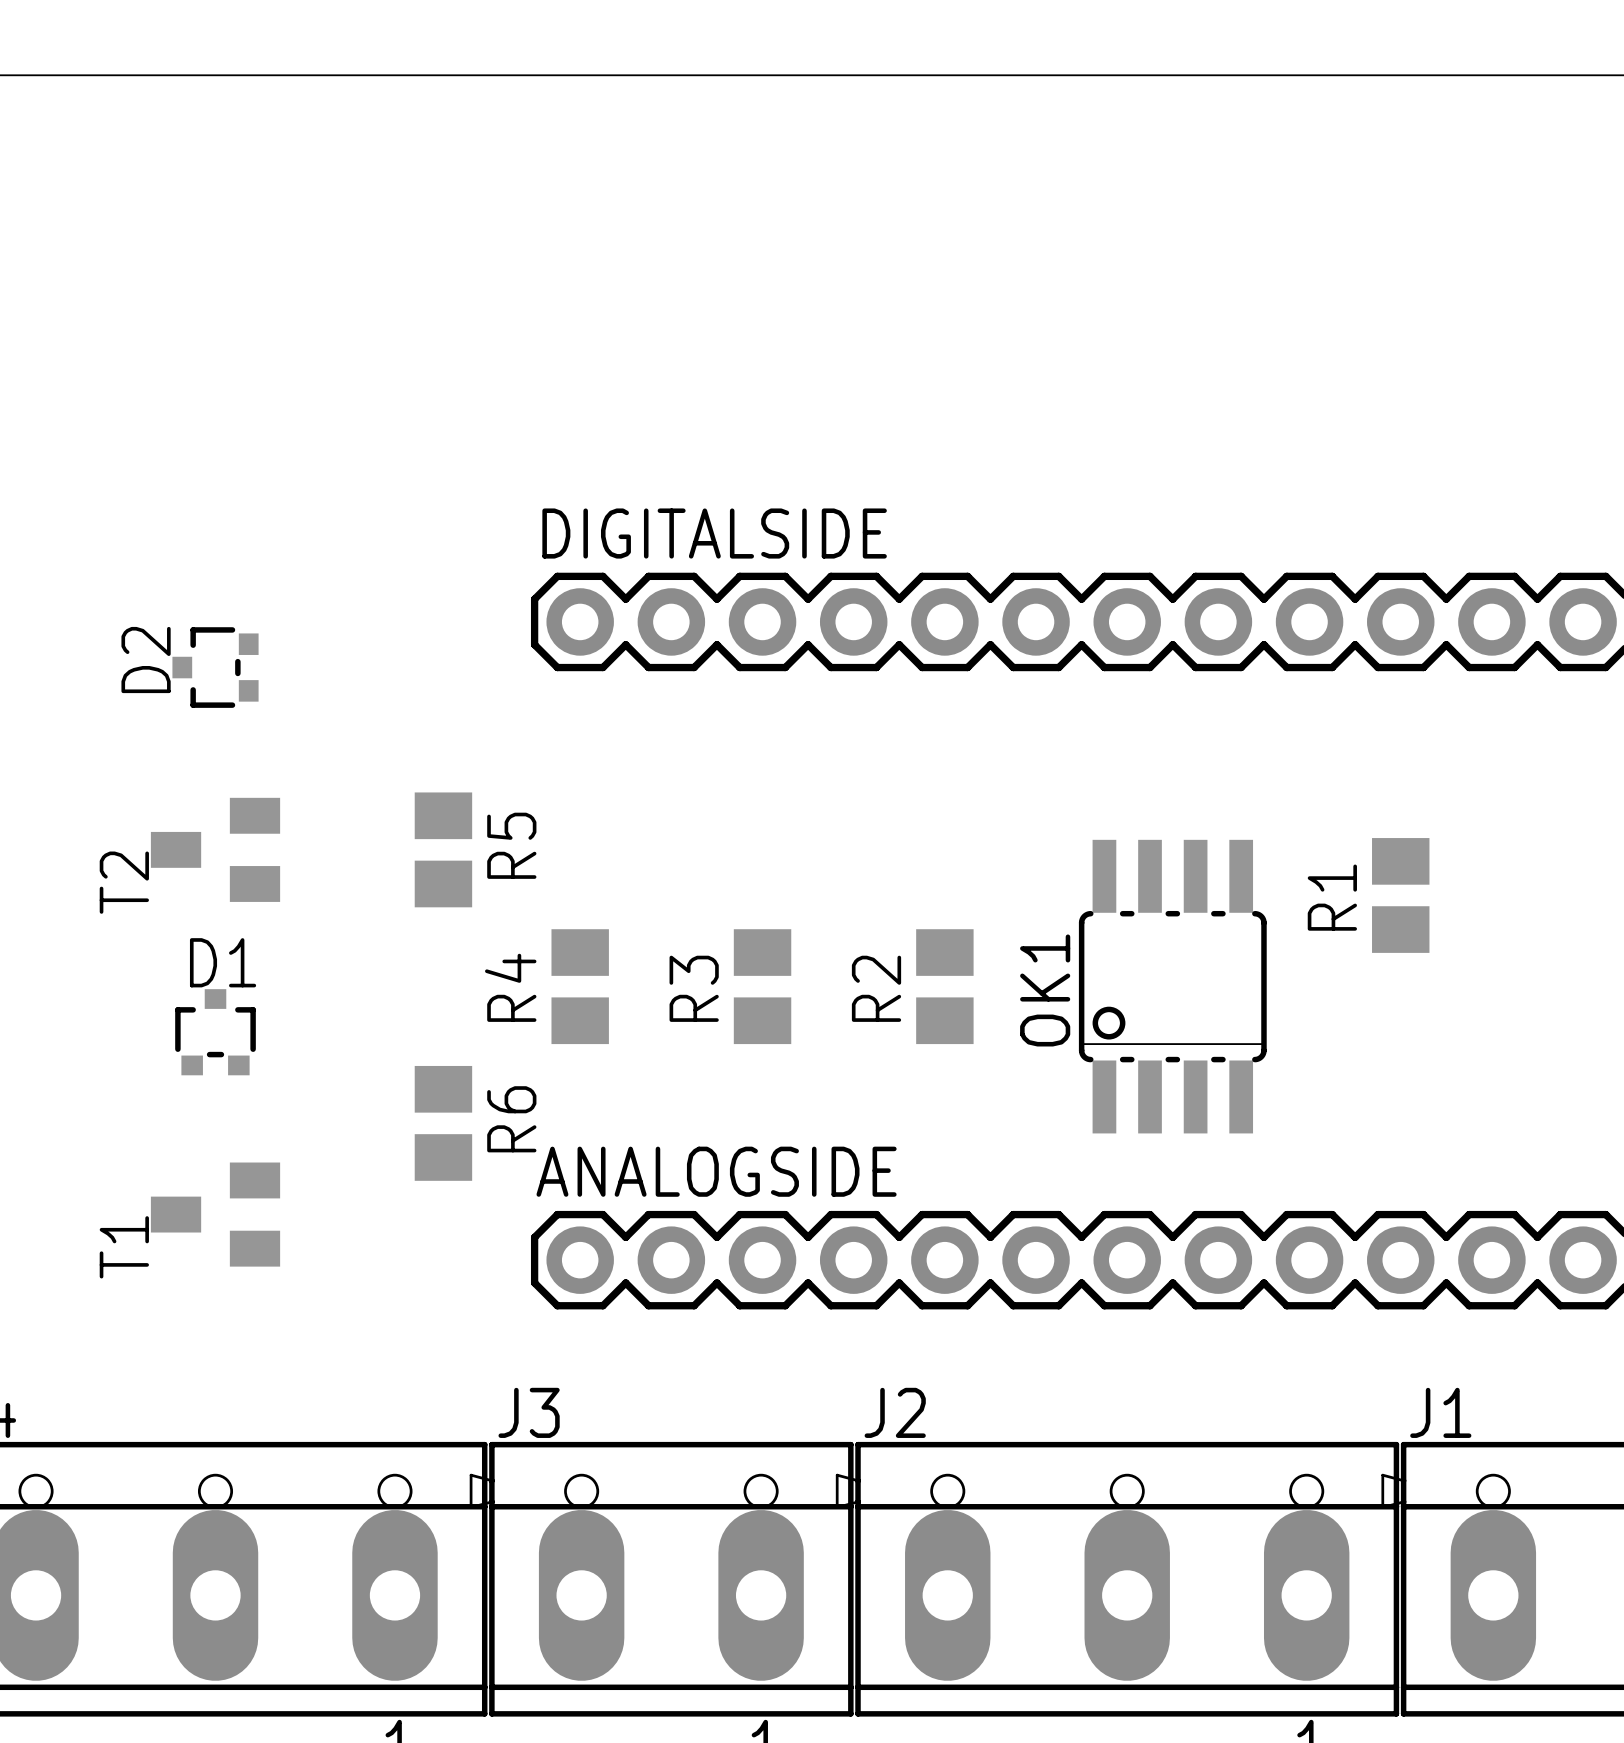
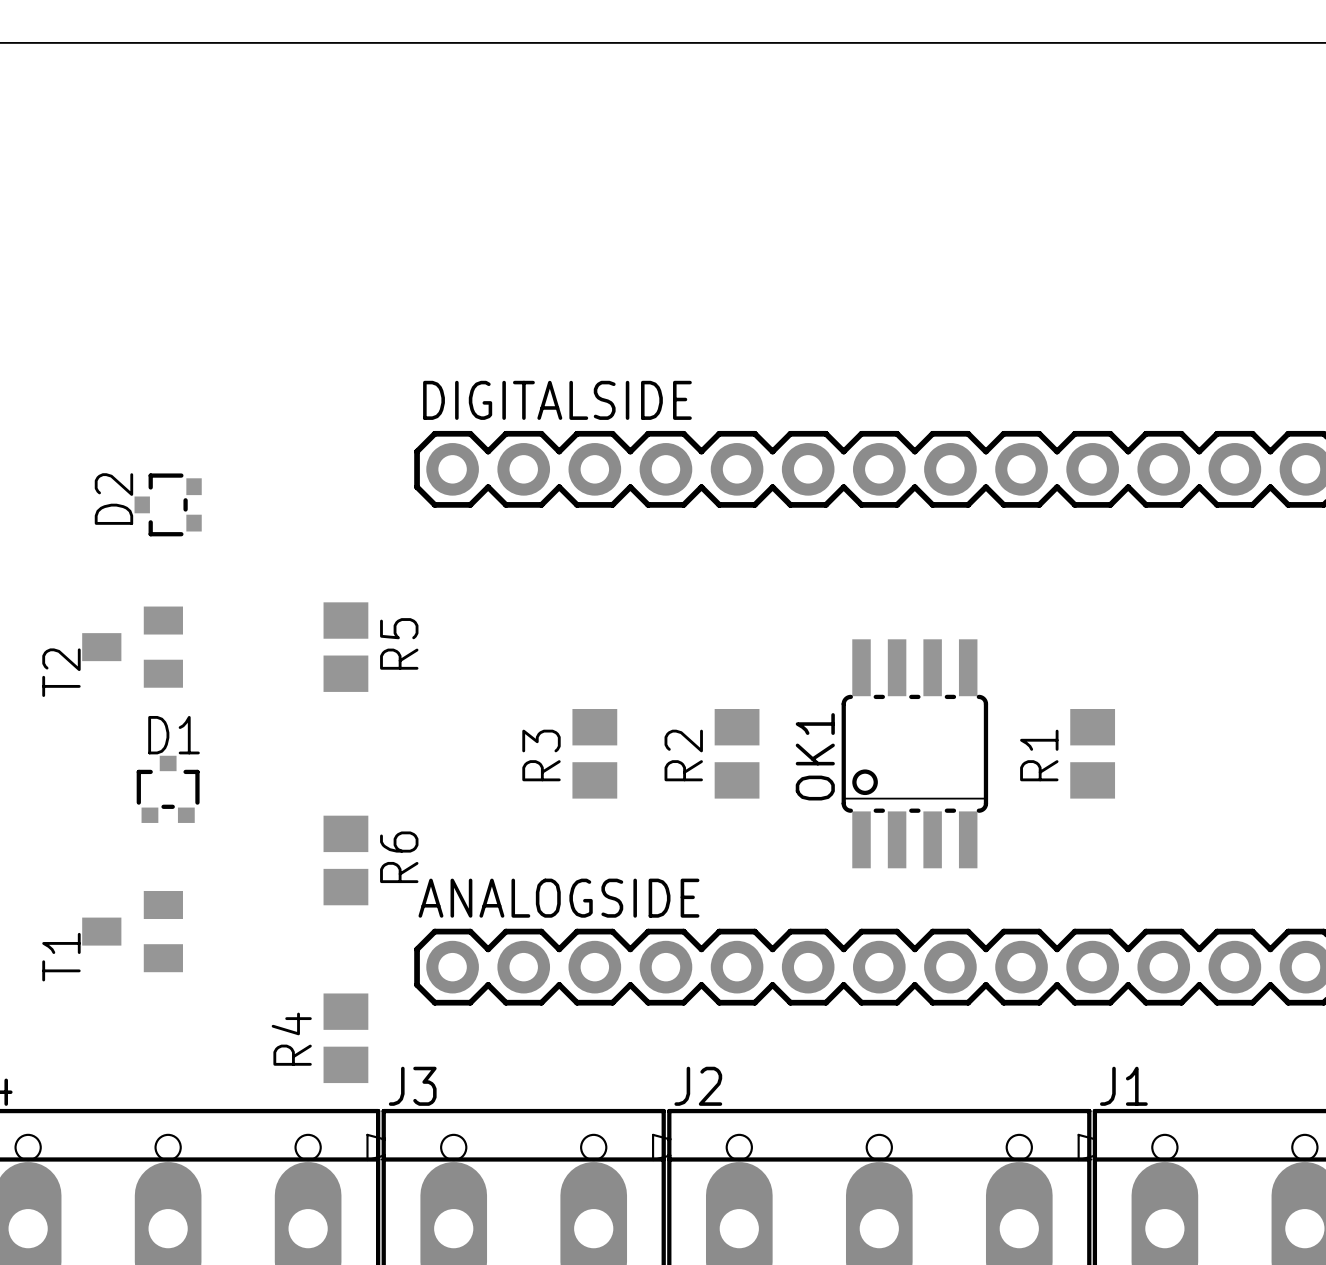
T2 position: (215, 849) -> (132, 647)
R1 position: (1400, 895) -> (1092, 753)
R4 position: (580, 986) -> (345, 1038)
T1 position: (215, 1214) -> (132, 931)

